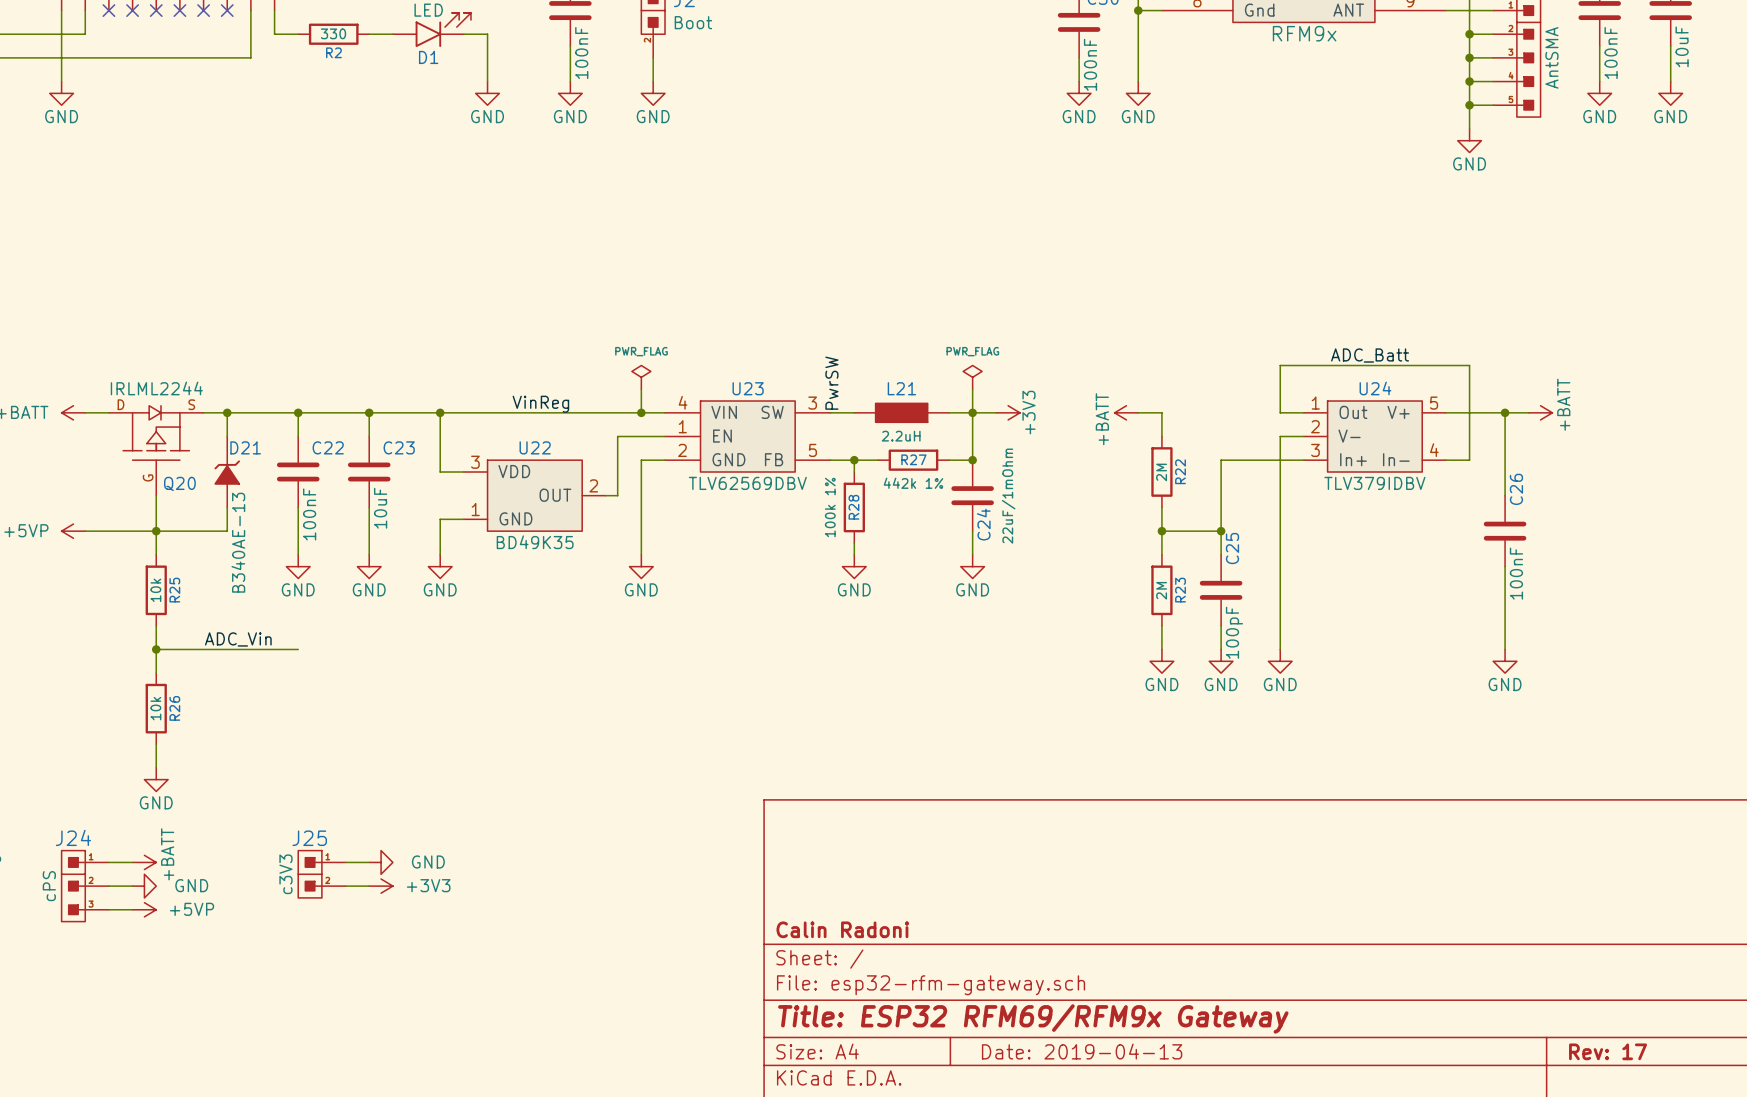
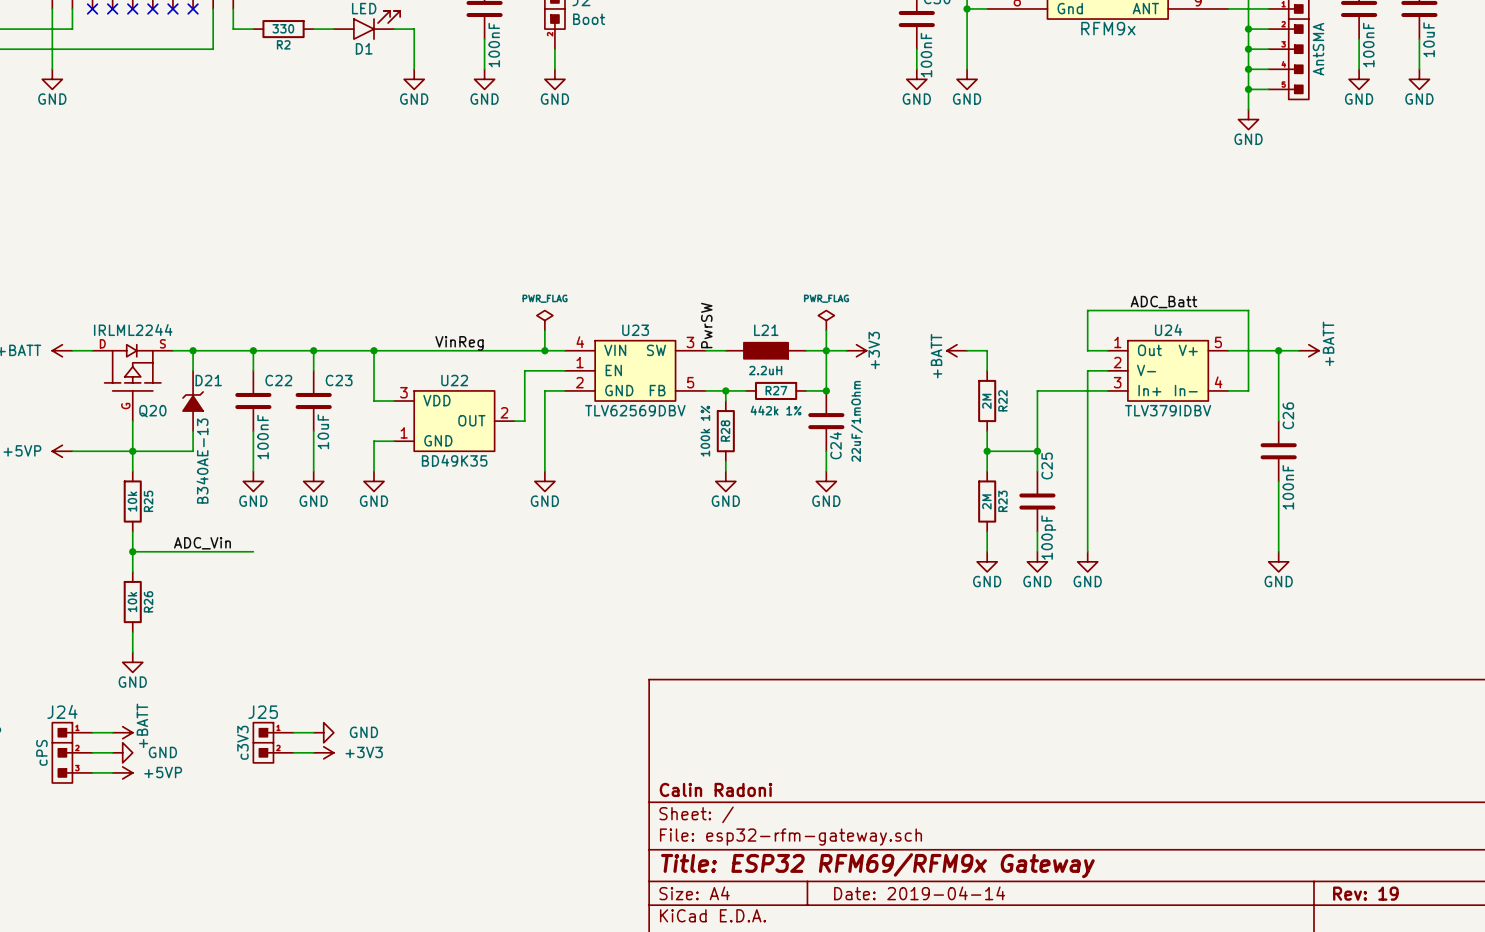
title block: Date: 2019-04-13 (1082, 1051) -> Date: 2019-04-14 (919, 893)
title block: Rev: 17 (1608, 1051) -> Rev: 19 (1365, 893)

